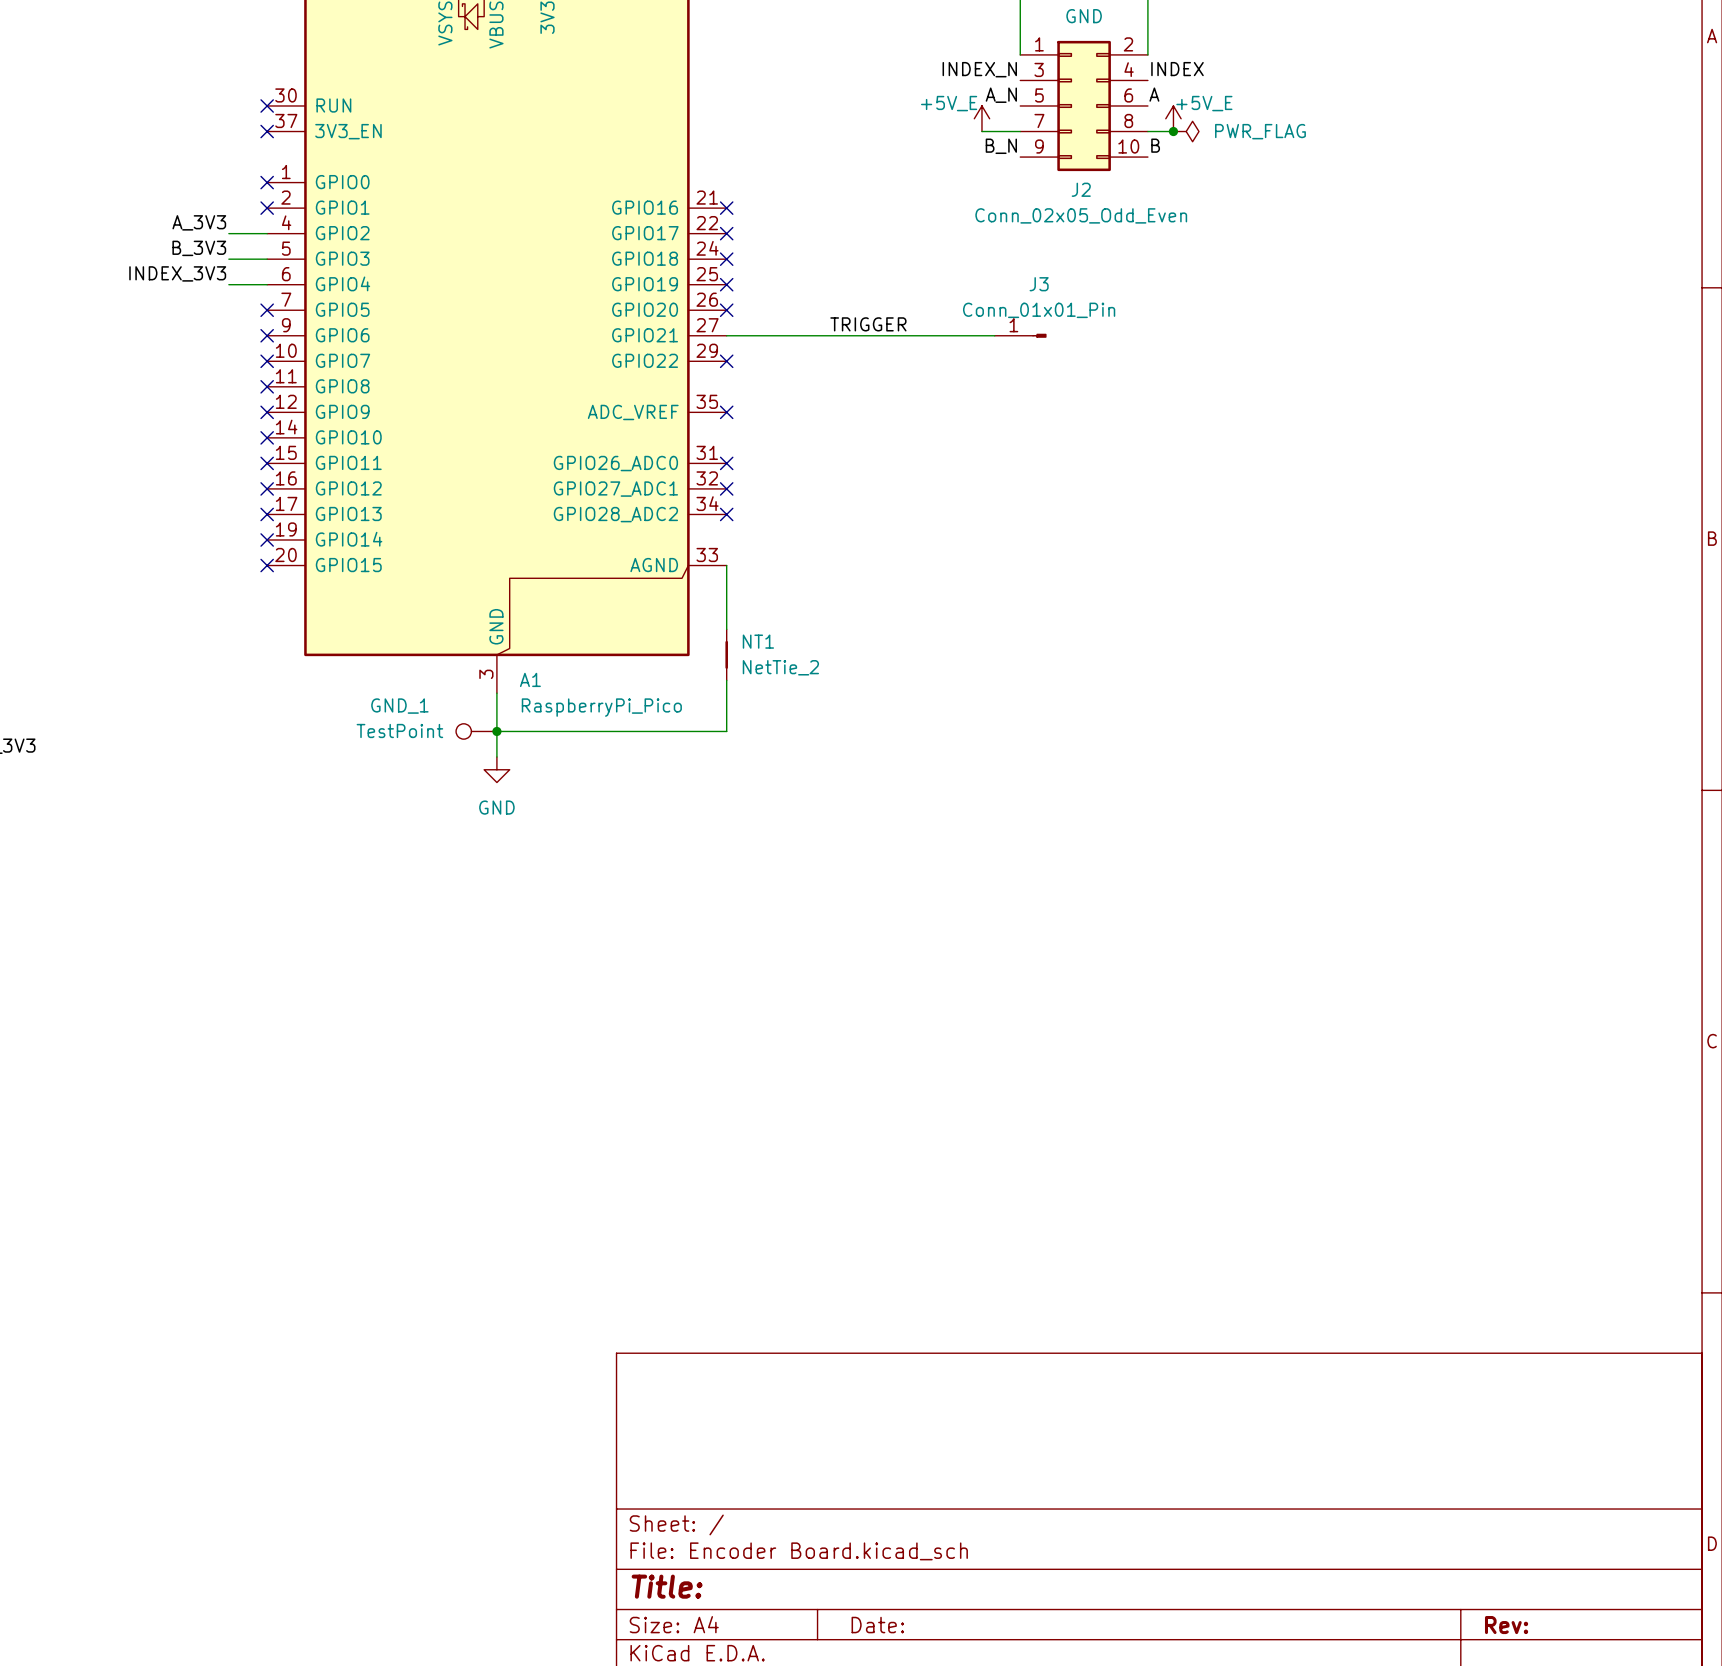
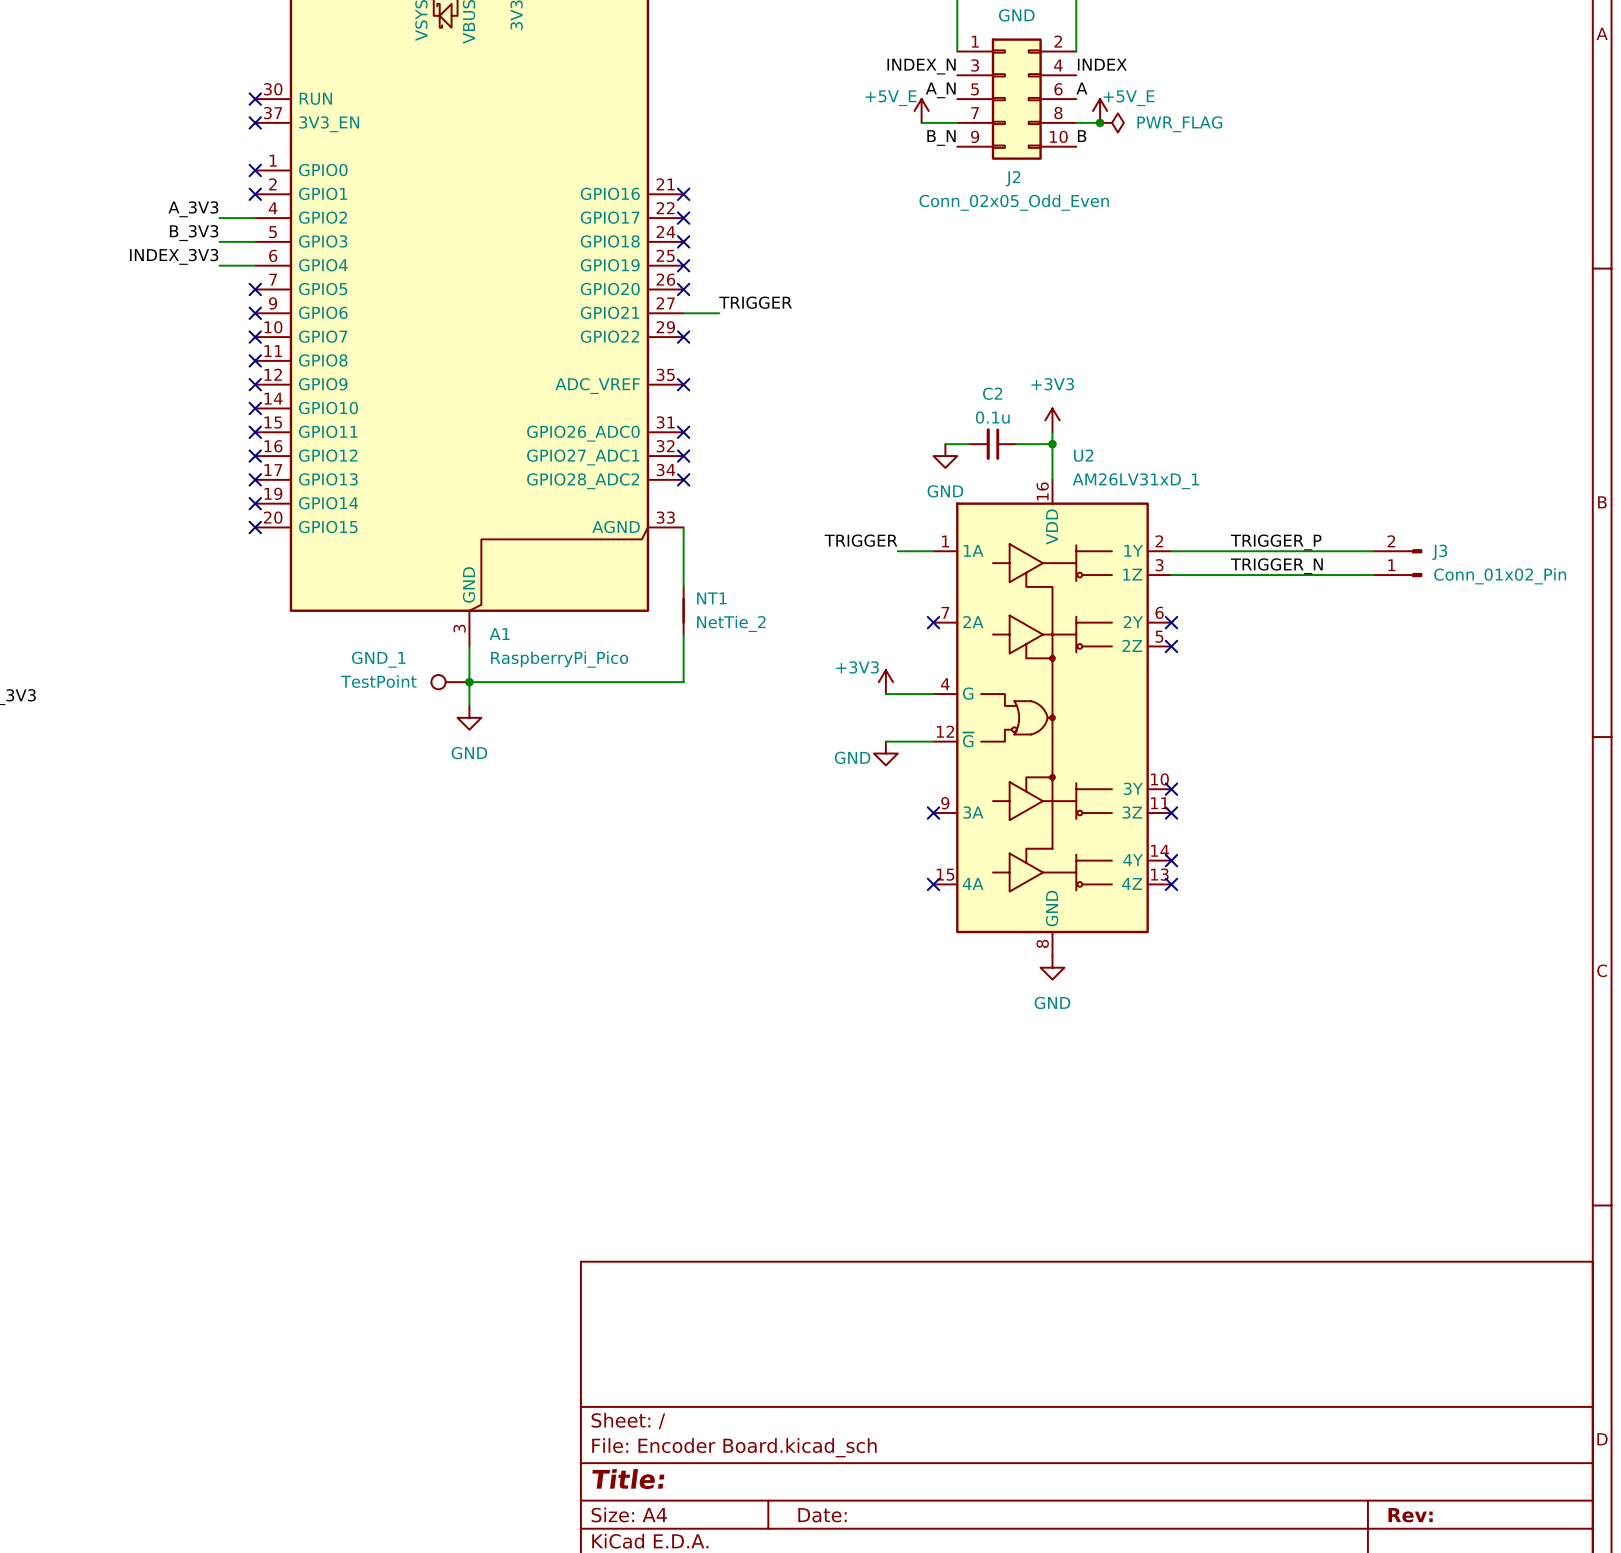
J3 name position: J3 (1039, 284) -> J3 (1439, 552)
J3 value: Conn_01x01_Pin (1039, 310) -> Conn_01x02_Pin (1500, 576)
label position: TRIGGER (868, 324) -> TRIGGER (755, 302)
J3 symbol: [994, 333, 1047, 338] -> [1373, 549, 1423, 577]
wire: (764, 335) (994, 335) -> none
power symbol: none -> +3V3 (1052, 420)
wire: none -> (1052, 432) (1052, 479)
wire: none -> (945, 444) (969, 444)
C2: none -> 0.1u (992, 444)
wire: none -> (1016, 444) (1052, 444)
junction: none -> (1052, 444)
power symbol: none -> GND (945, 456)
label: none -> TRIGGER (861, 540)
label: none -> TRIGGER_P (1276, 542)
wire: none -> (897, 551) (933, 551)
wire: none -> (1171, 551) (1373, 551)
label: none -> TRIGGER_N (1276, 566)
wire: none -> (1171, 575) (1373, 575)
no-connect mark: none -> (933, 622)
no-connect mark: none -> (1171, 622)
no-connect mark: none -> (1171, 646)
power symbol: none -> +3V3 (885, 682)
wire: none -> (885, 694) (933, 694)
U2: none -> AM26LV31xD_1 (1052, 717)
wire: none -> (885, 741) (933, 741)
power symbol: none -> GND (885, 753)
no-connect mark: none -> (1171, 789)
no-connect mark: none -> (933, 813)
no-connect mark: none -> (1171, 813)
no-connect mark: none -> (1171, 860)
no-connect mark: none -> (933, 884)
no-connect mark: none -> (1171, 884)
power symbol: none -> GND (1052, 967)

